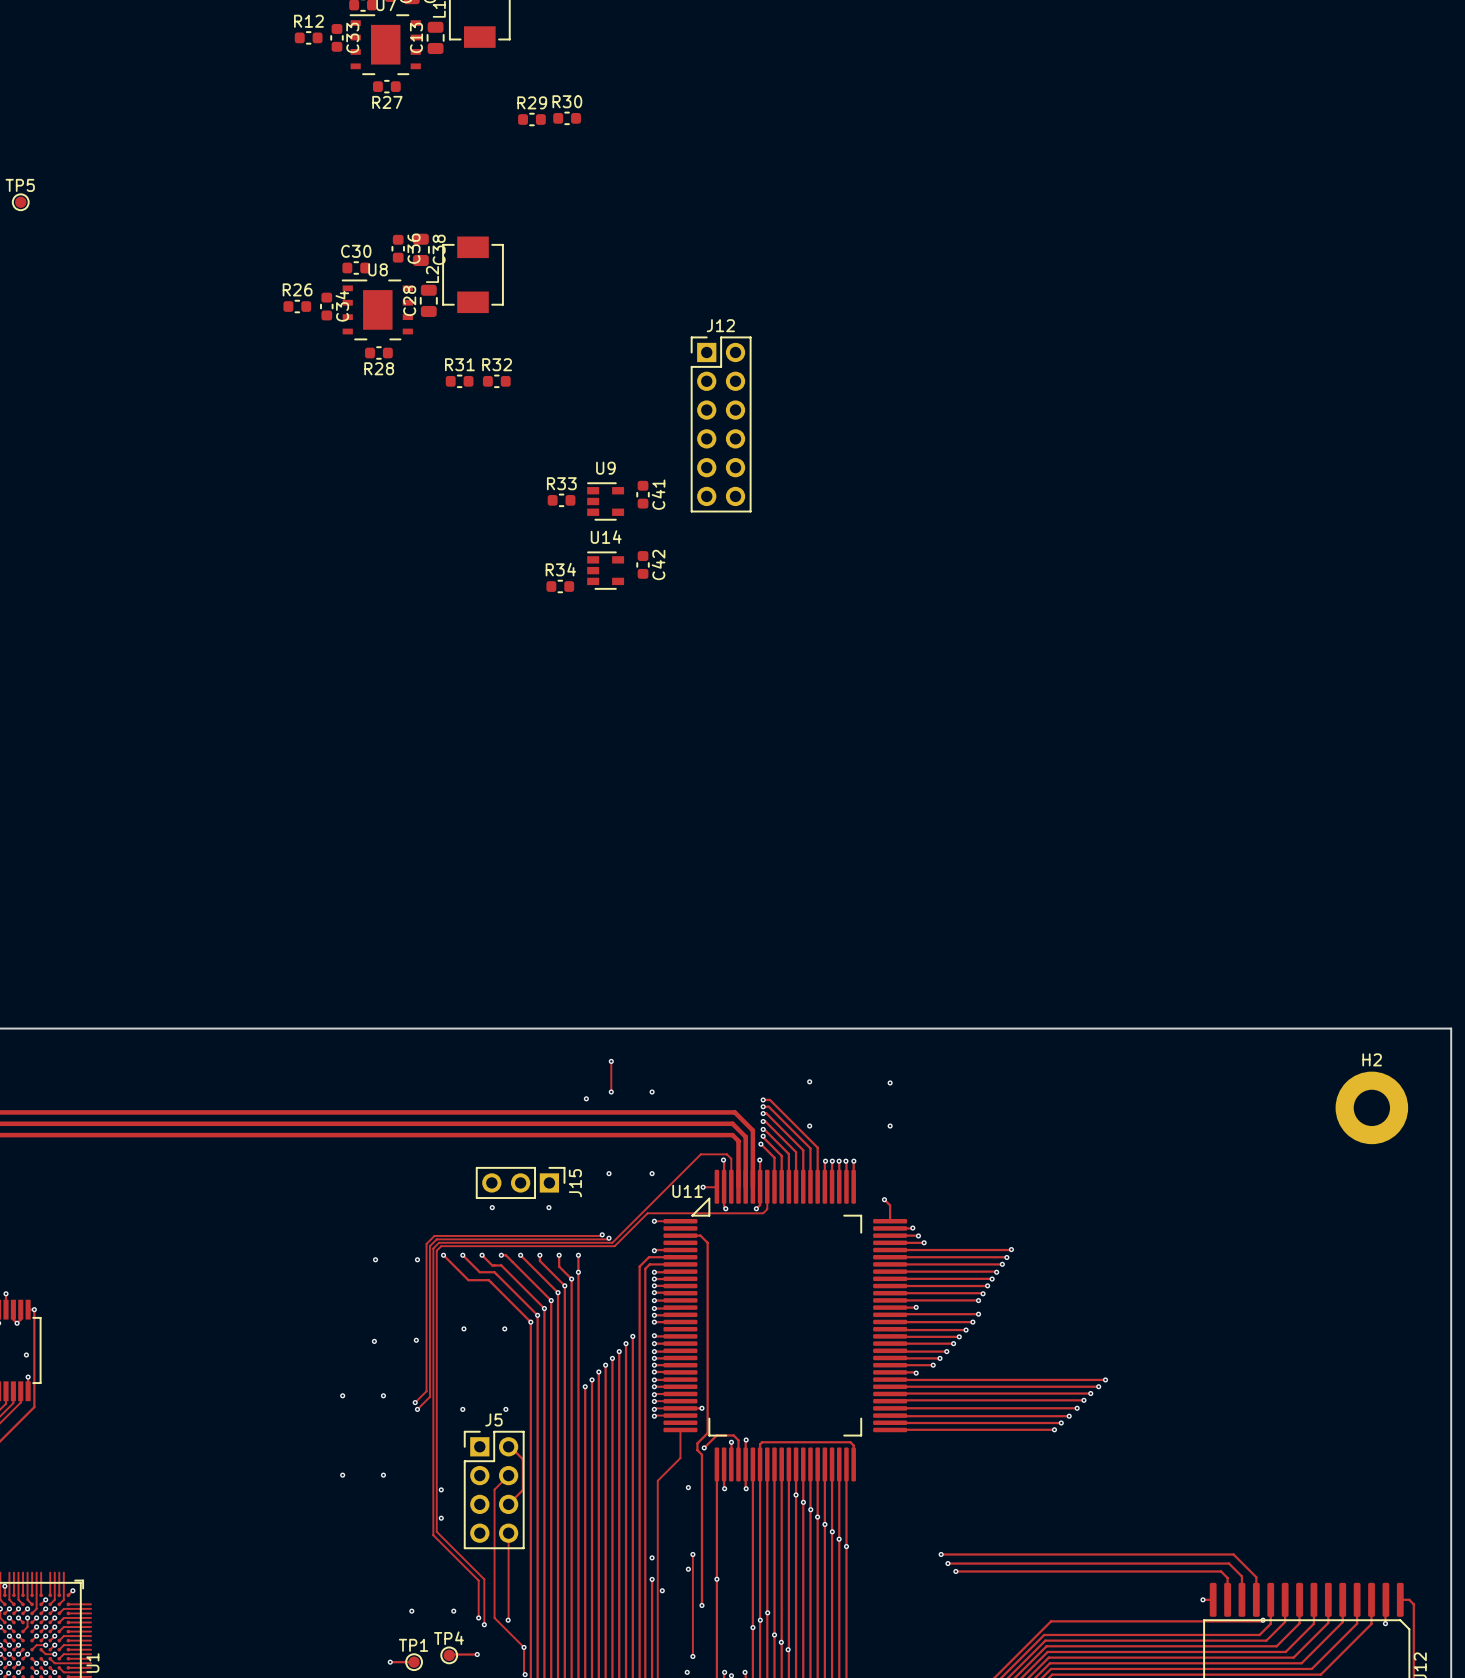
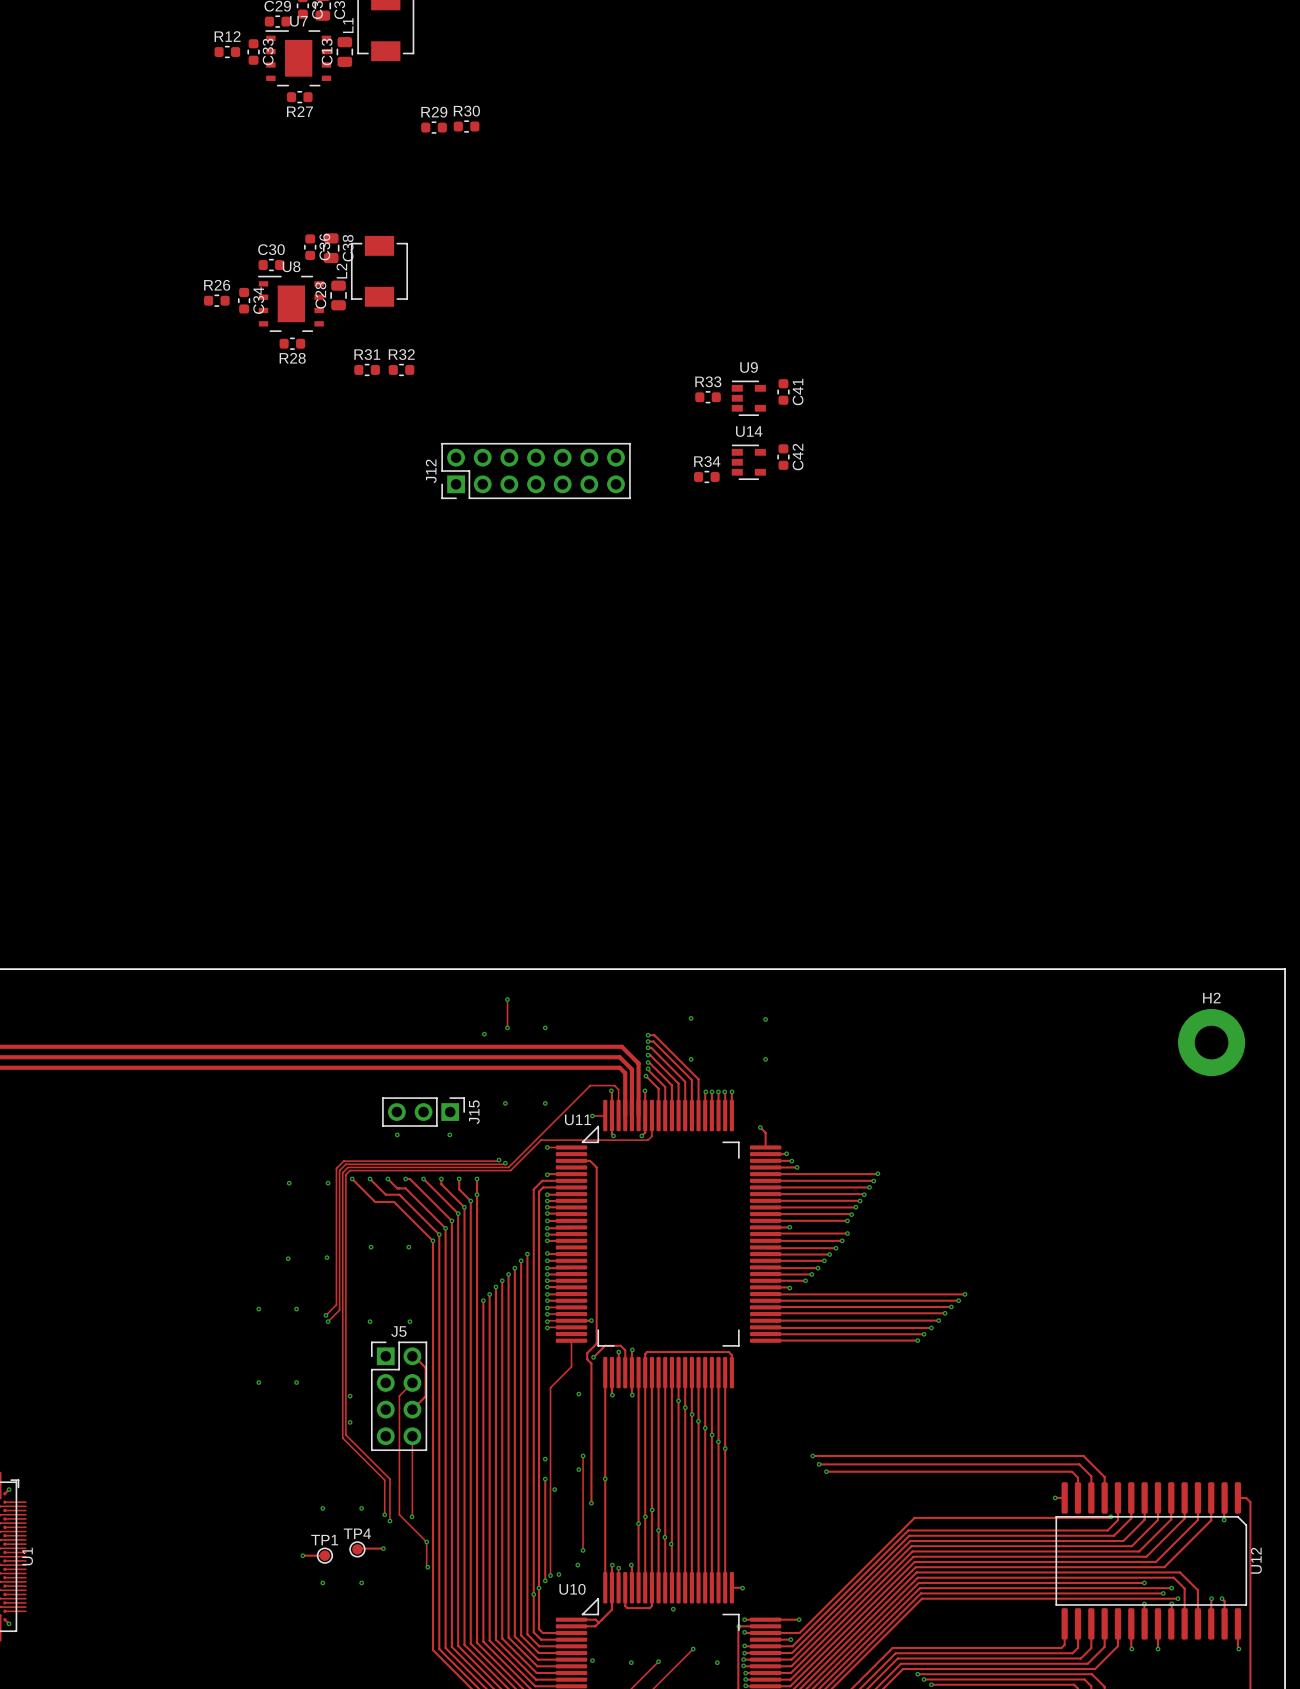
J12 name position: J12 (720, 325) -> J12 (431, 471)
J12 footprint: [690, 336, 752, 513] -> [441, 443, 631, 499]
C41 position: (643, 494) -> (783, 391)
R33 position: (561, 500) -> (708, 397)
U9 position: (605, 501) -> (748, 398)
C42 position: (643, 564) -> (783, 457)
U14 position: (605, 570) -> (748, 462)
R34 position: (560, 586) -> (706, 476)

